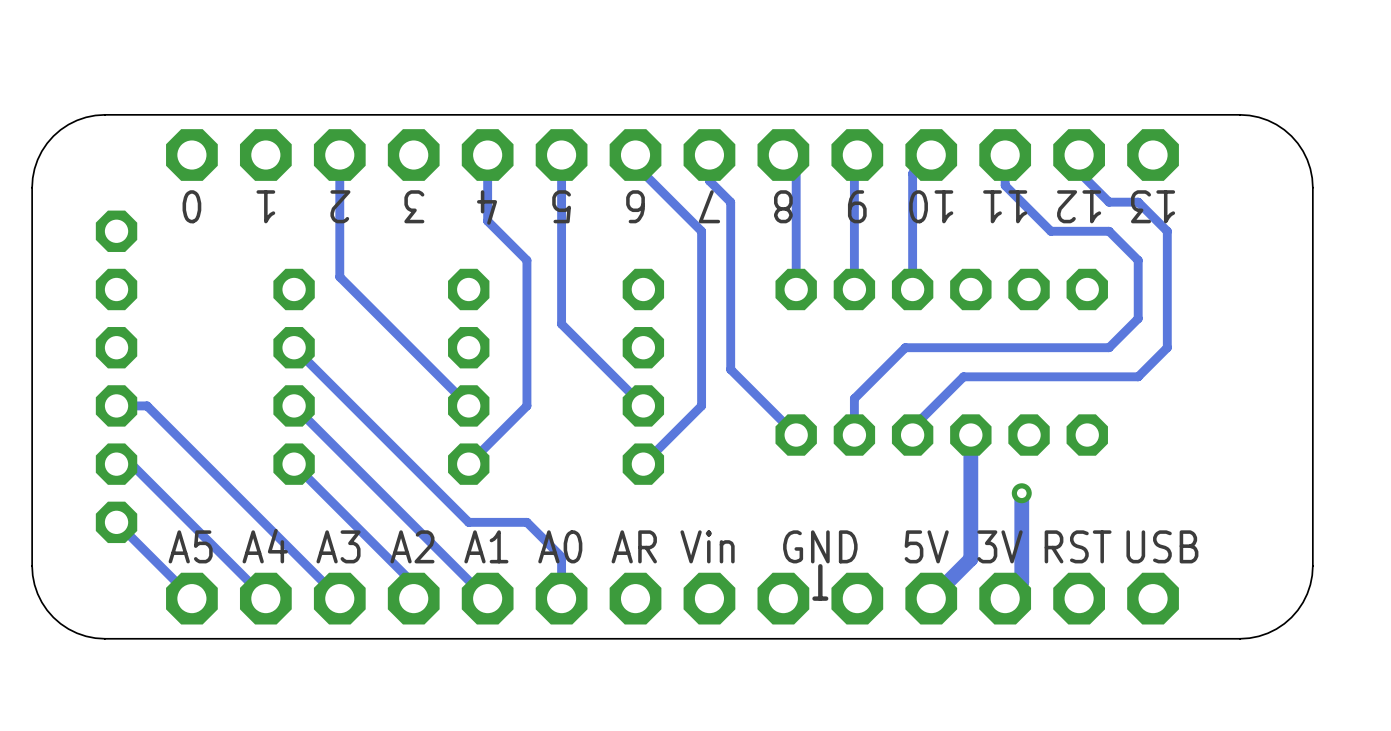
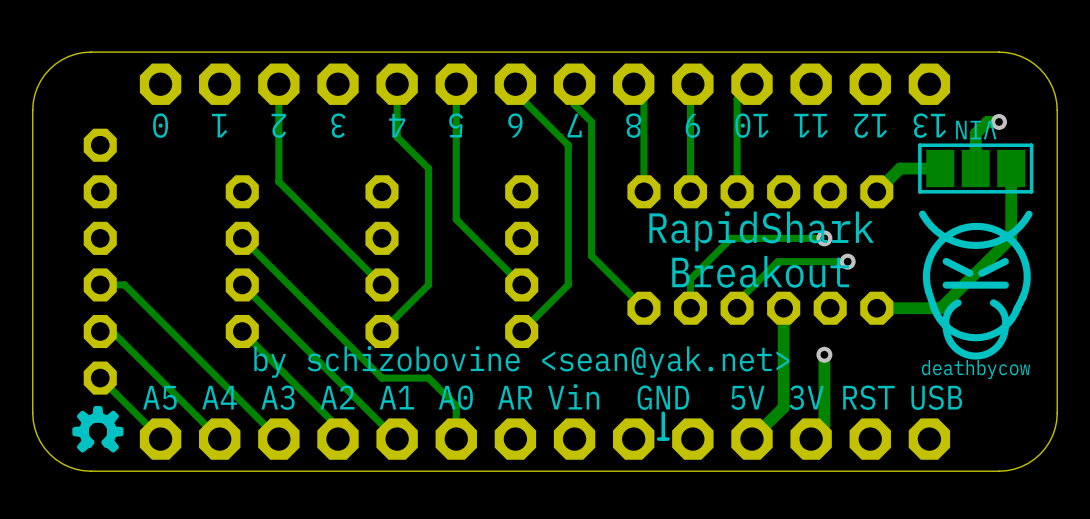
track: (1005, 155) (1005, 185) (1050, 231) (1109, 231) (1138, 260) (1138, 318) (1109, 347) (1021, 347) -> none
track: (1079, 155) (1079, 172) (1109, 202) (1138, 202) (1167, 231) (1167, 347) (1138, 376) (1050, 376) -> none
track: none -> (999, 121) (987, 121) (975, 133) (975, 168)
via: none -> (999, 121)
track: none -> (940, 168) (900, 168) (876, 191)
VIN: none -> (975, 168)
track: none -> (1011, 168) (1011, 237) (940, 308) (876, 308)
drawing: none -> [918, 210, 1033, 360]
text: none -> RapidShark (761, 231)
via: none -> (824, 238)
via: none -> (847, 261)
text: none -> Breakout (760, 271)
text: none -> by schizobovine <sean@yak.net> (521, 361)
drawing: none -> [72, 406, 124, 453]

